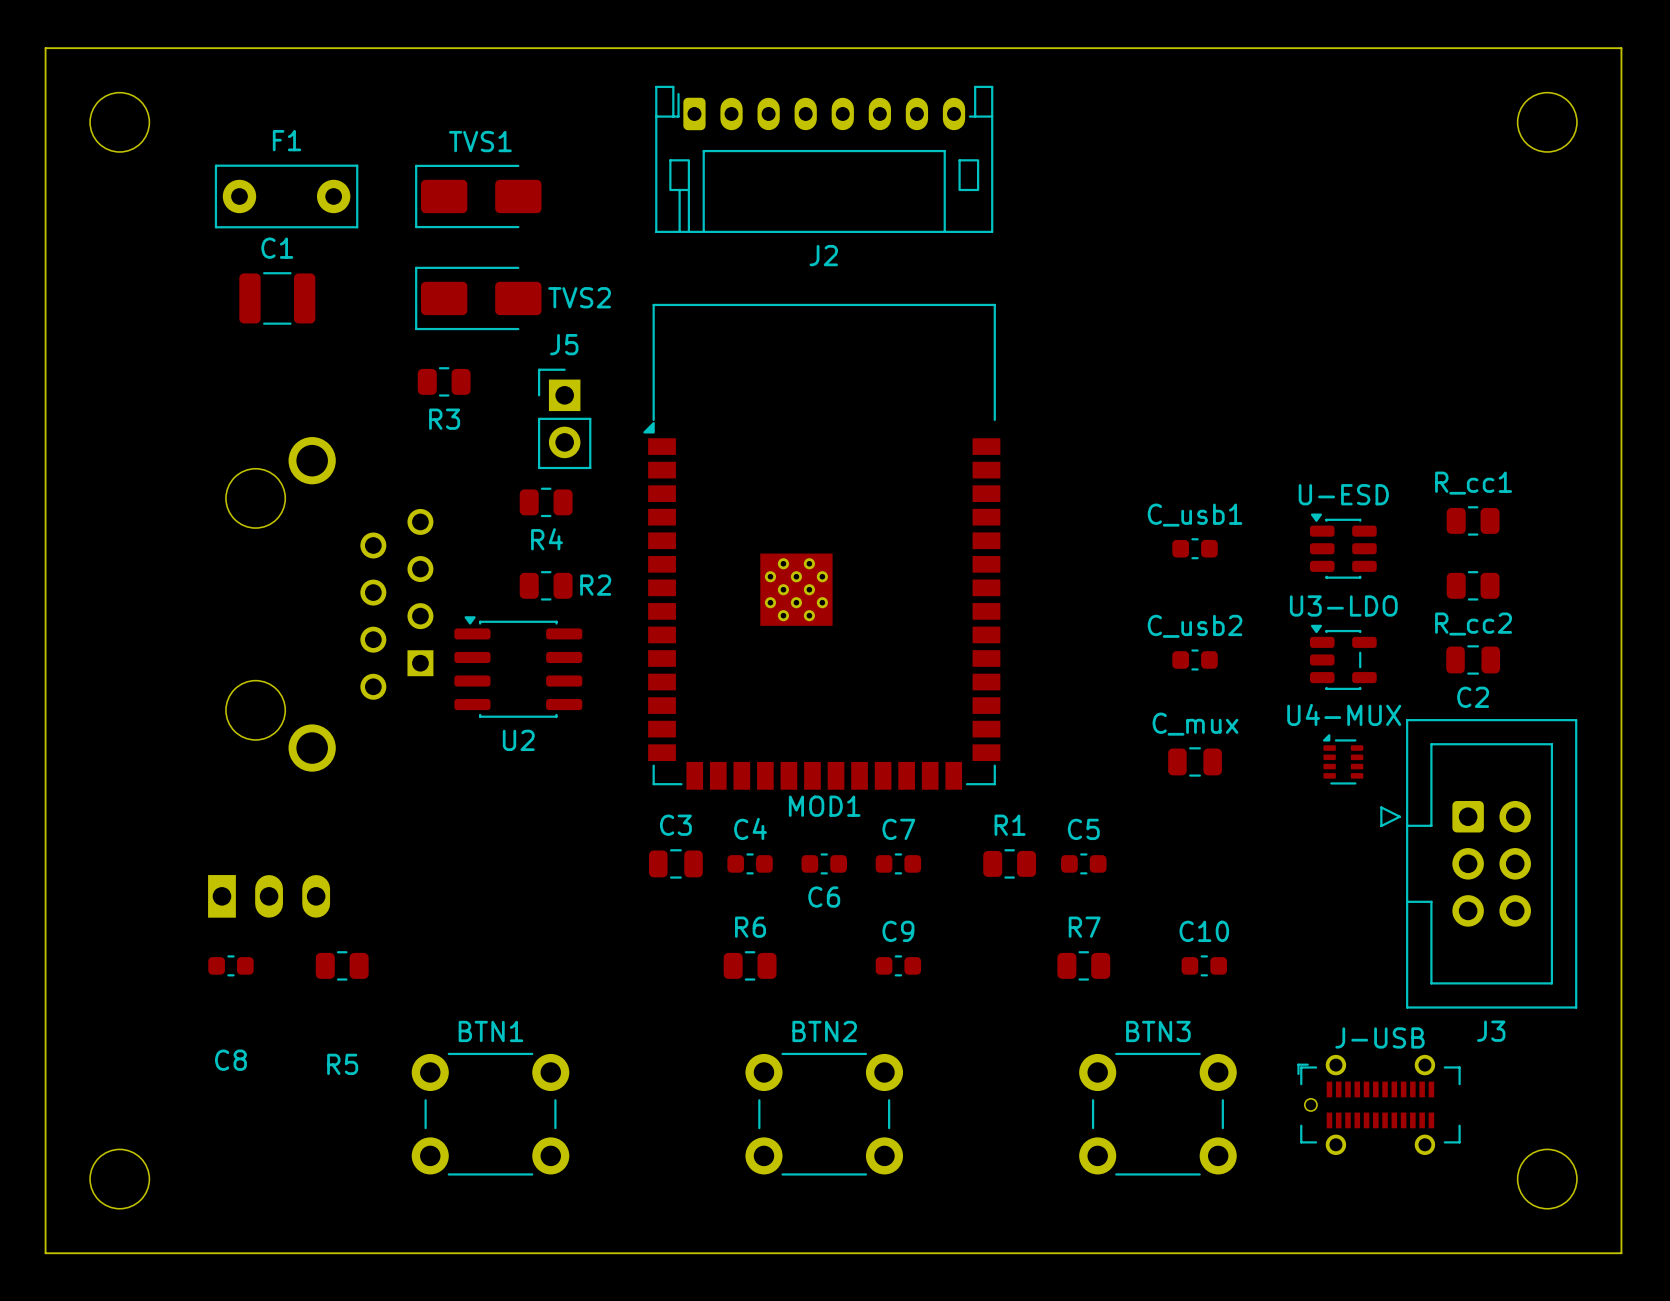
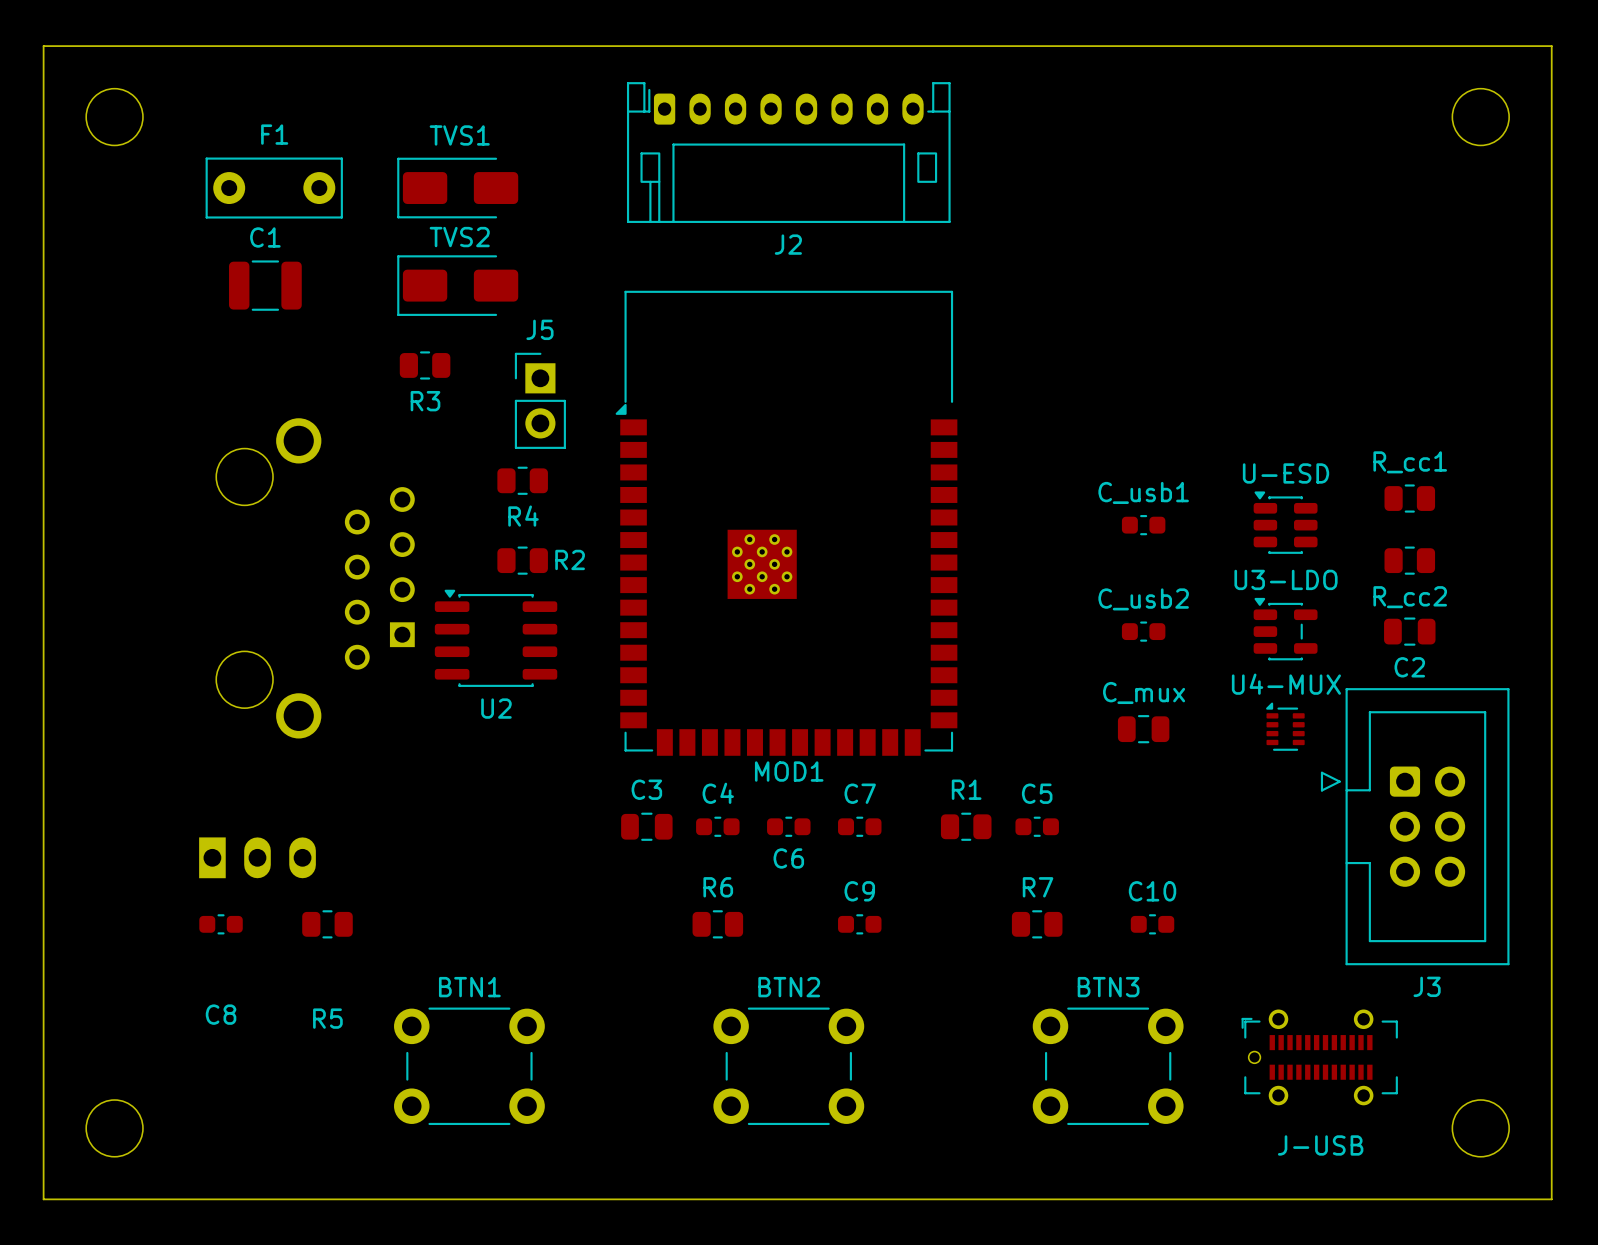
TVS2 name position: TVS2 (579, 297) -> TVS2 (459, 237)
J-USB name position: J-USB (1379, 1037) -> J-USB (1320, 1145)

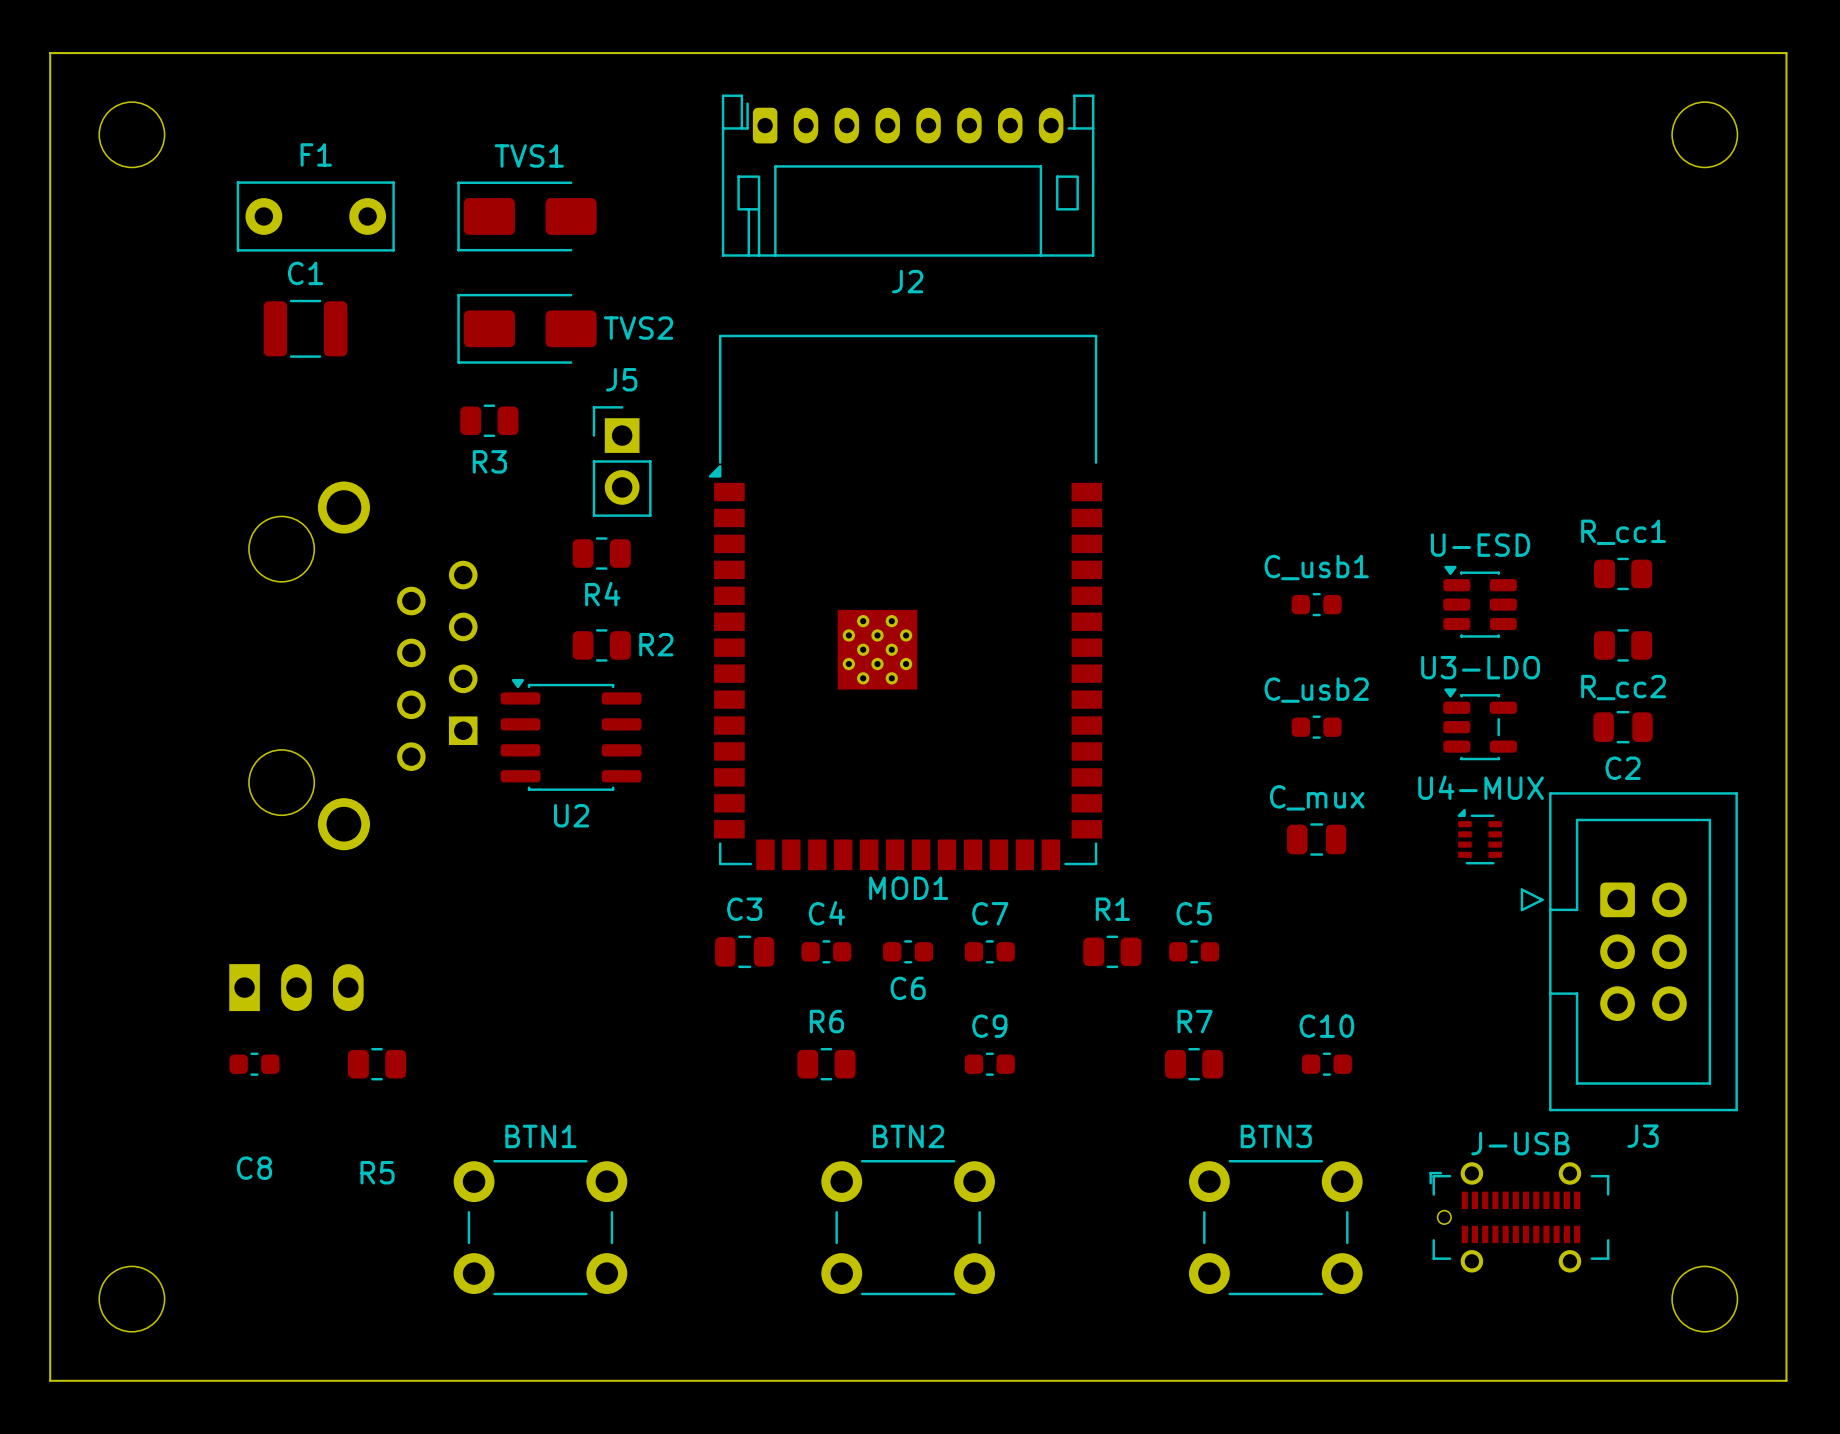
TVS2 name position: TVS2 (459, 237) -> TVS2 (638, 328)
J-USB name position: J-USB (1320, 1145) -> J-USB (1520, 1143)

